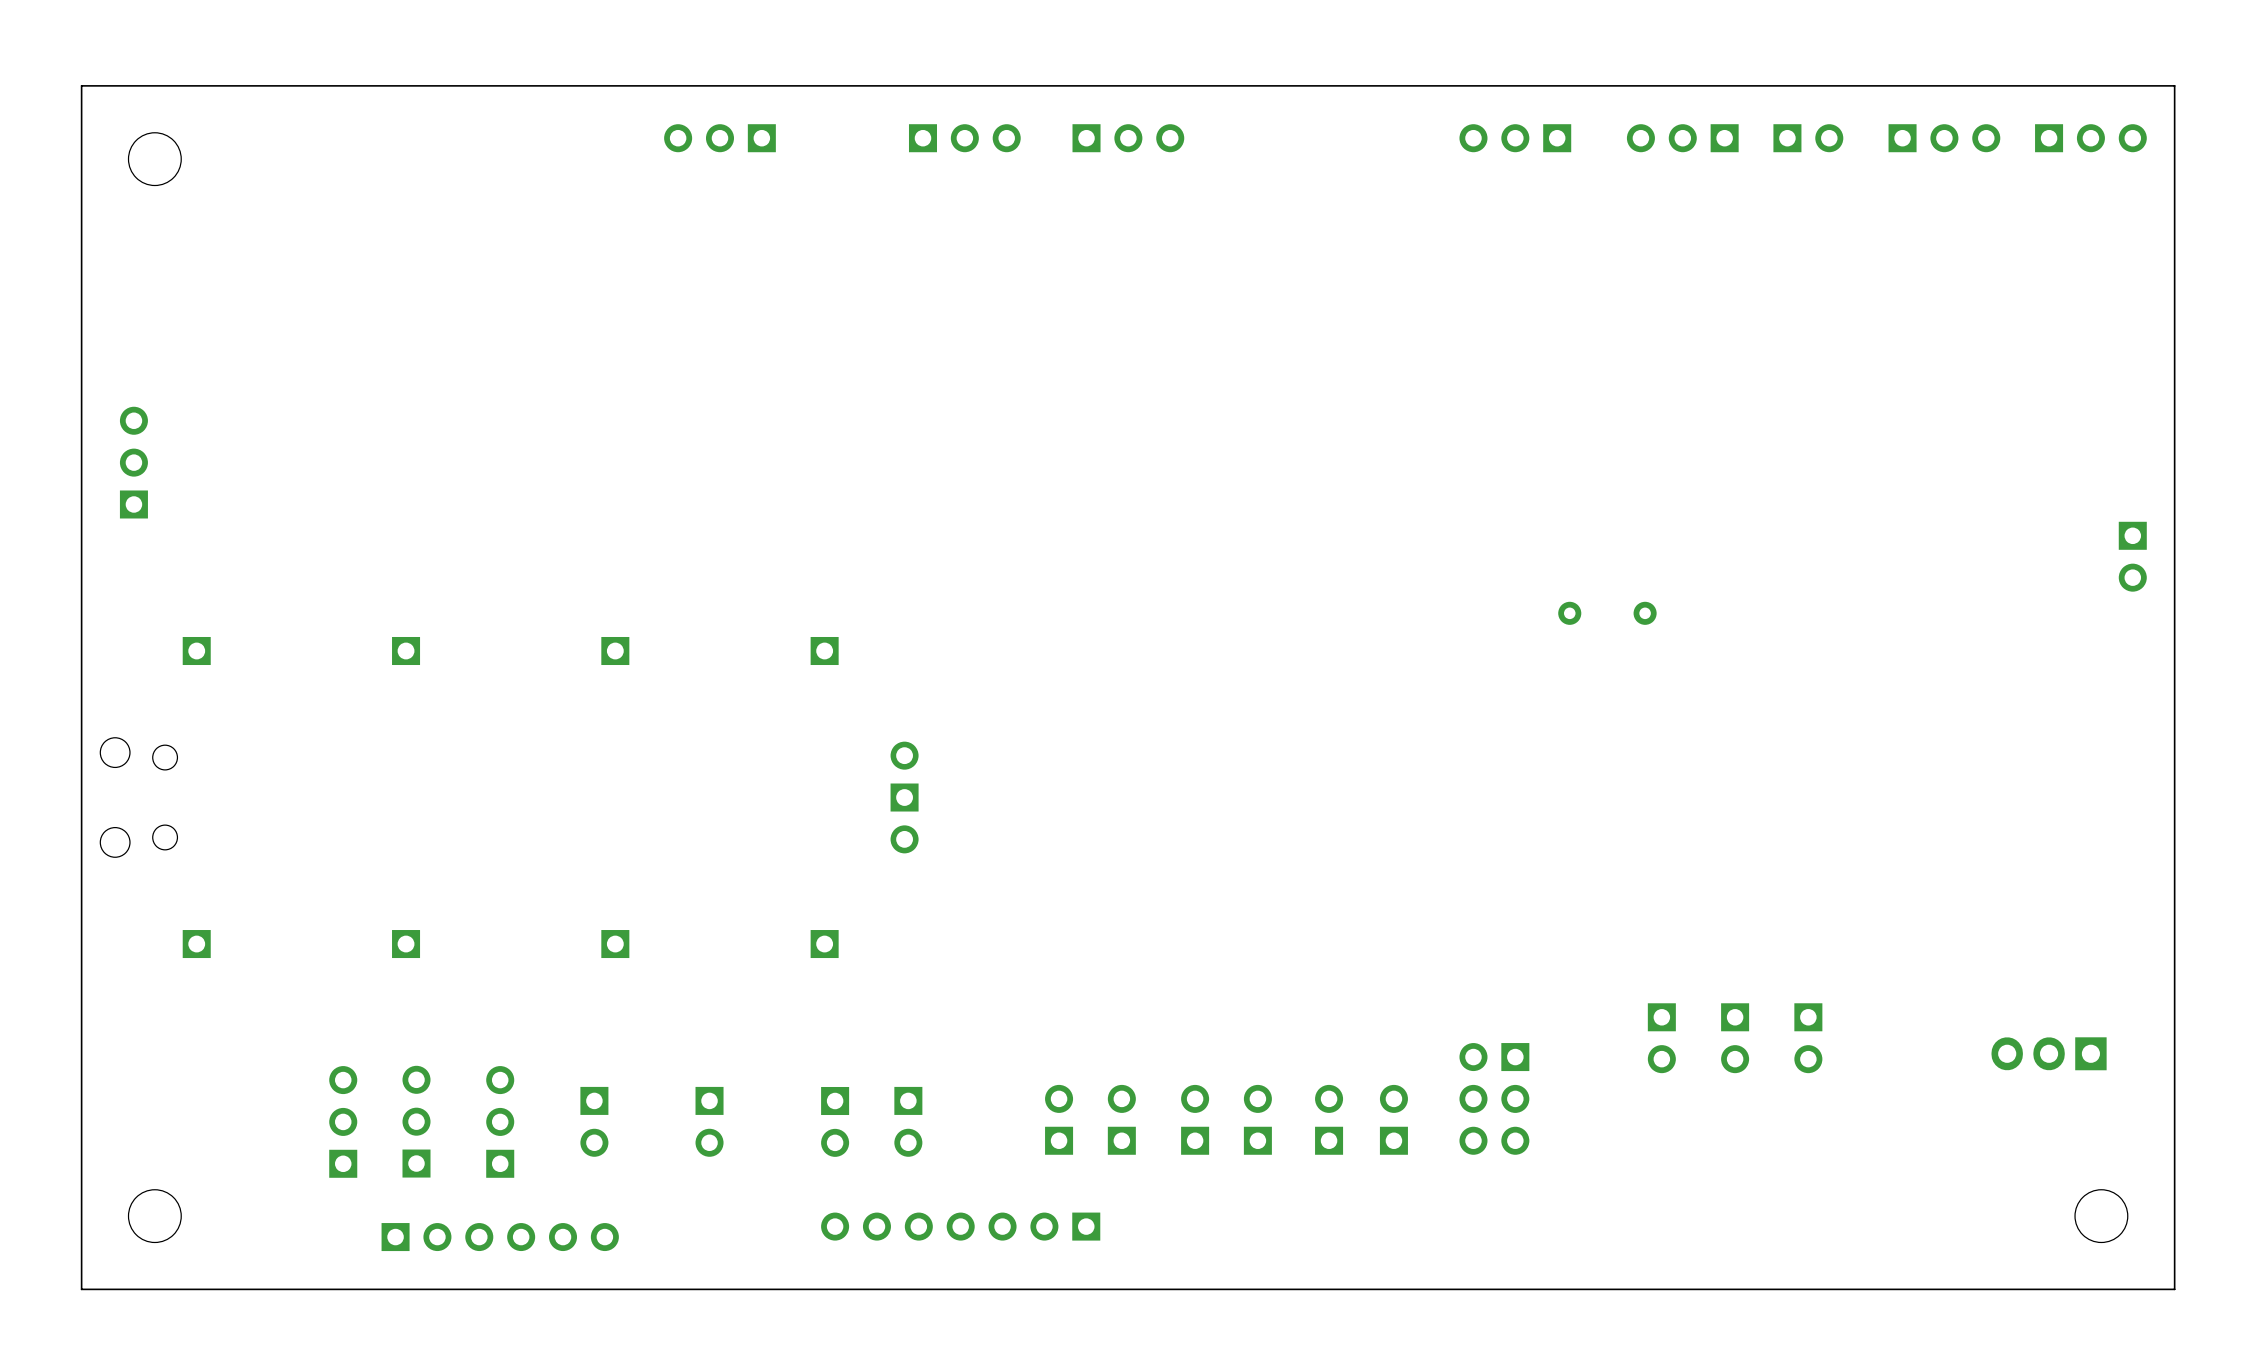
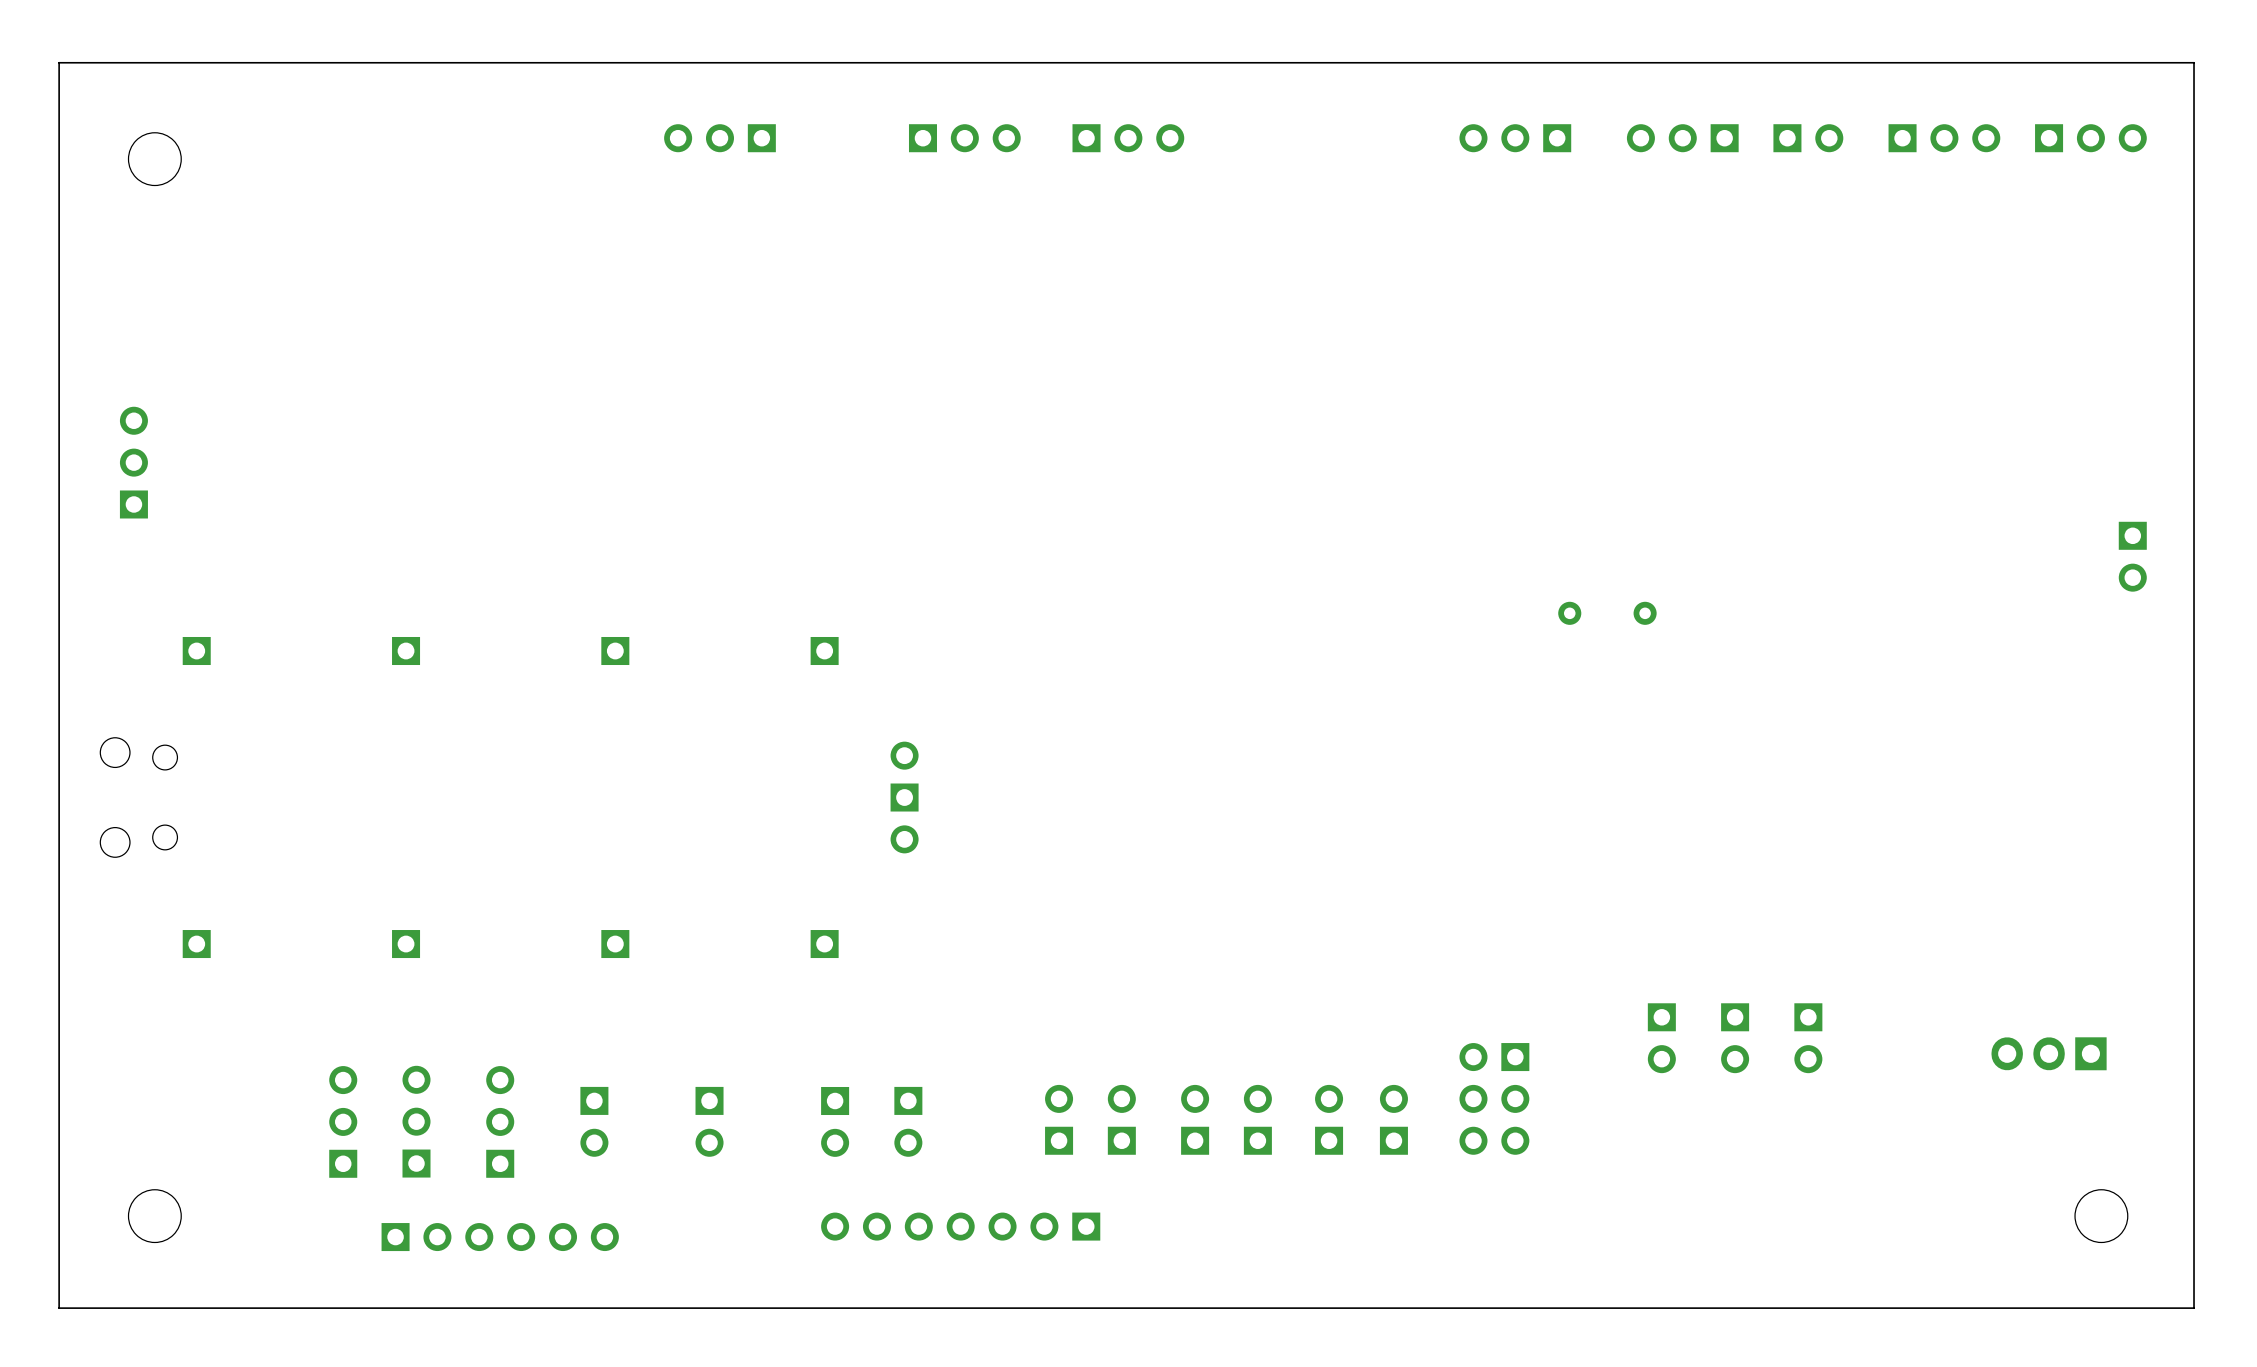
board edge: (2174, 85) (81, 85) (81, 1289) (2174, 1289) (2174, 85) -> (2194, 62) (2194, 1308) (59, 1308) (59, 62) (2194, 62)

